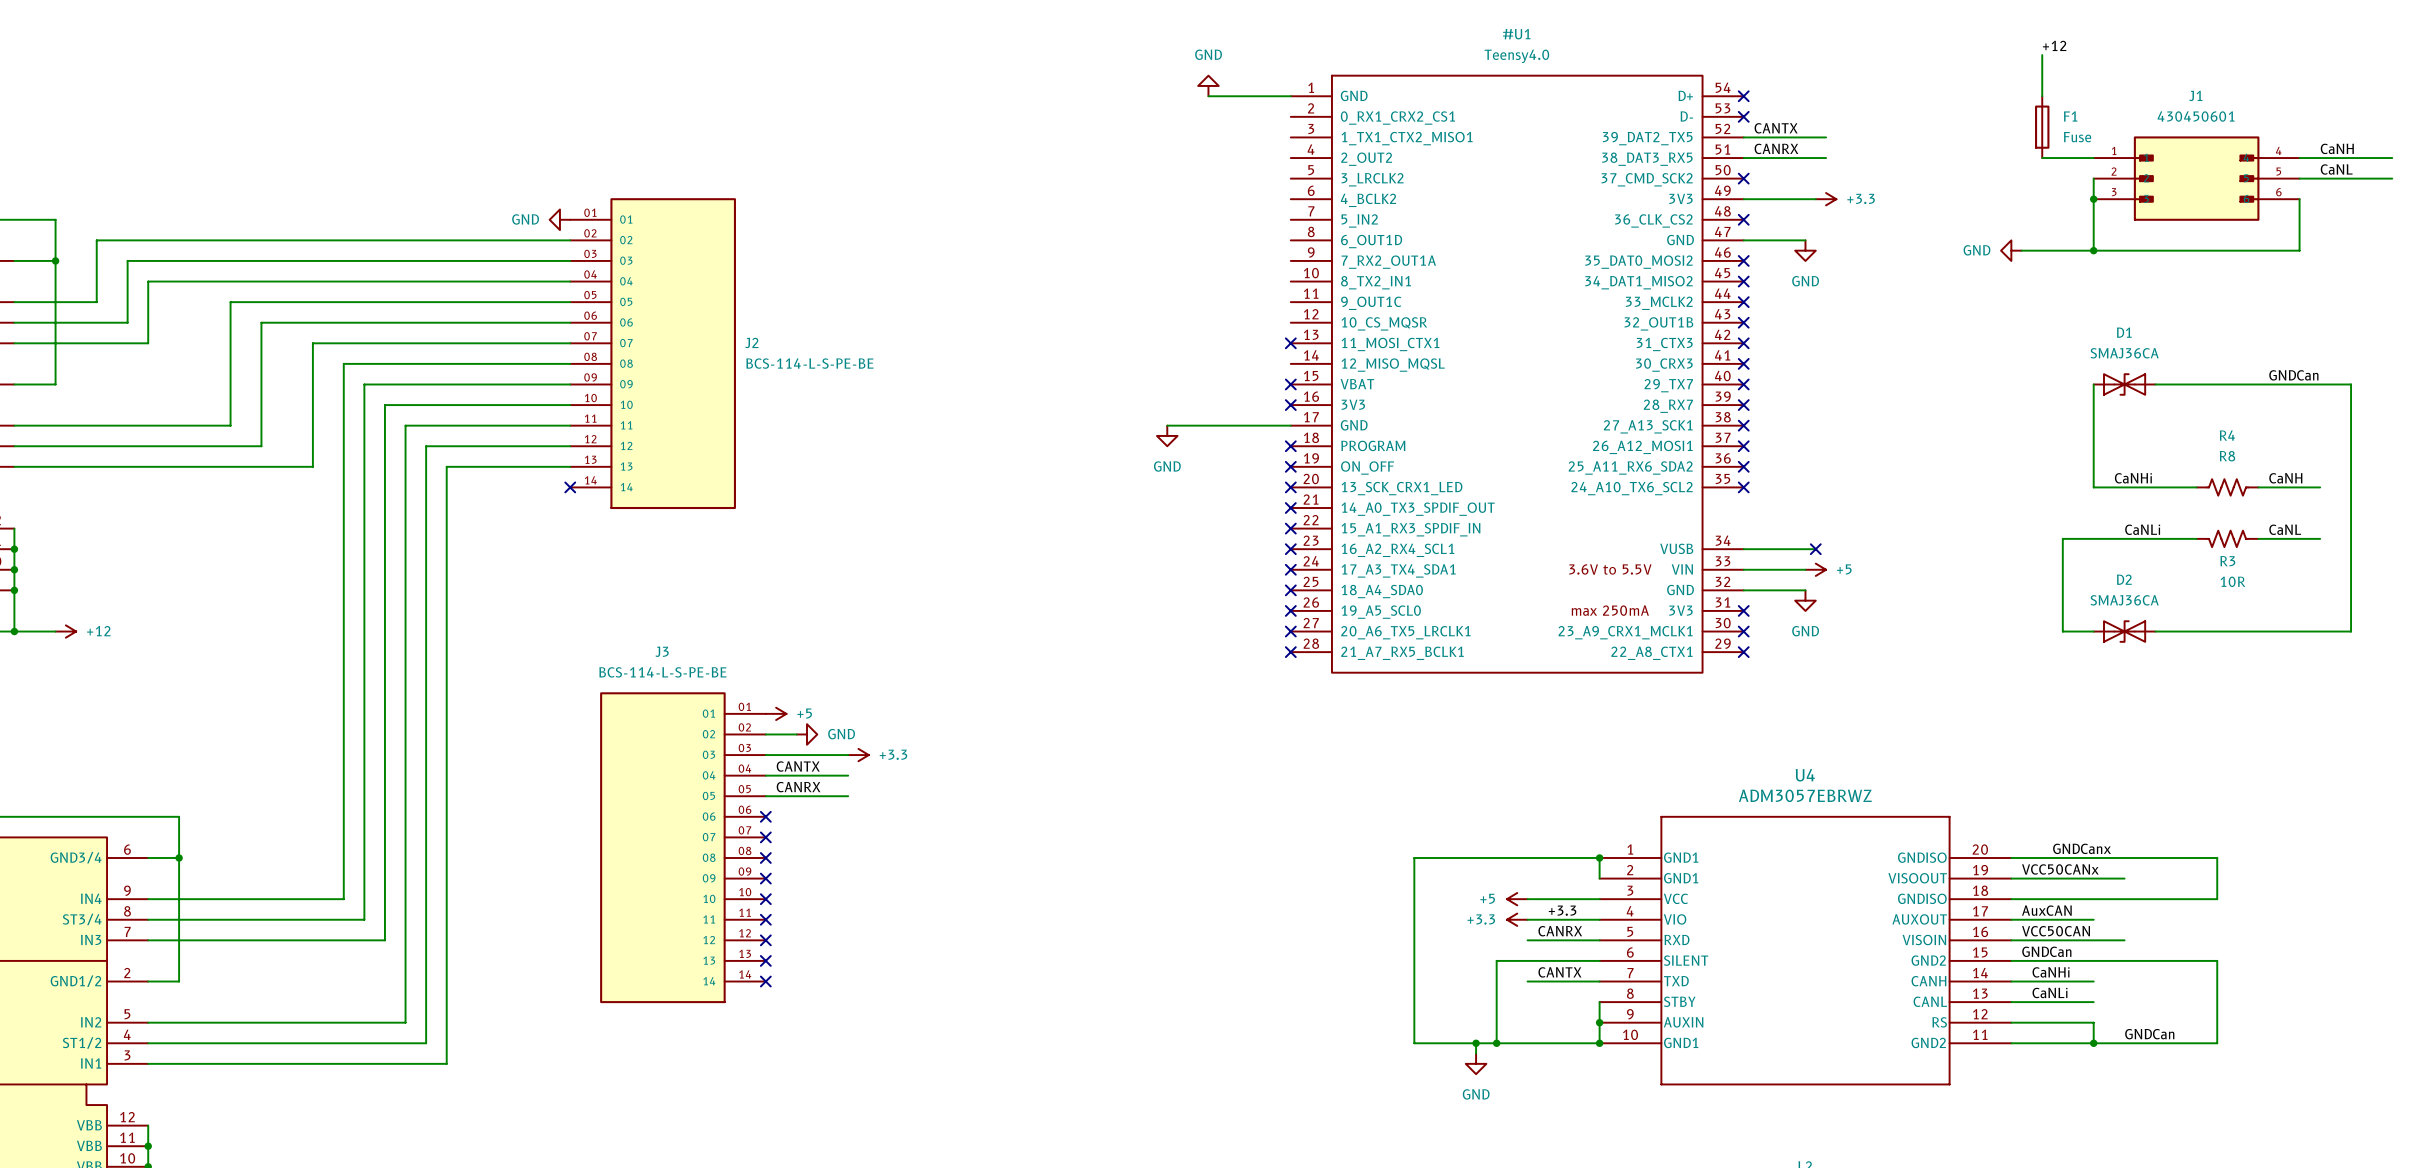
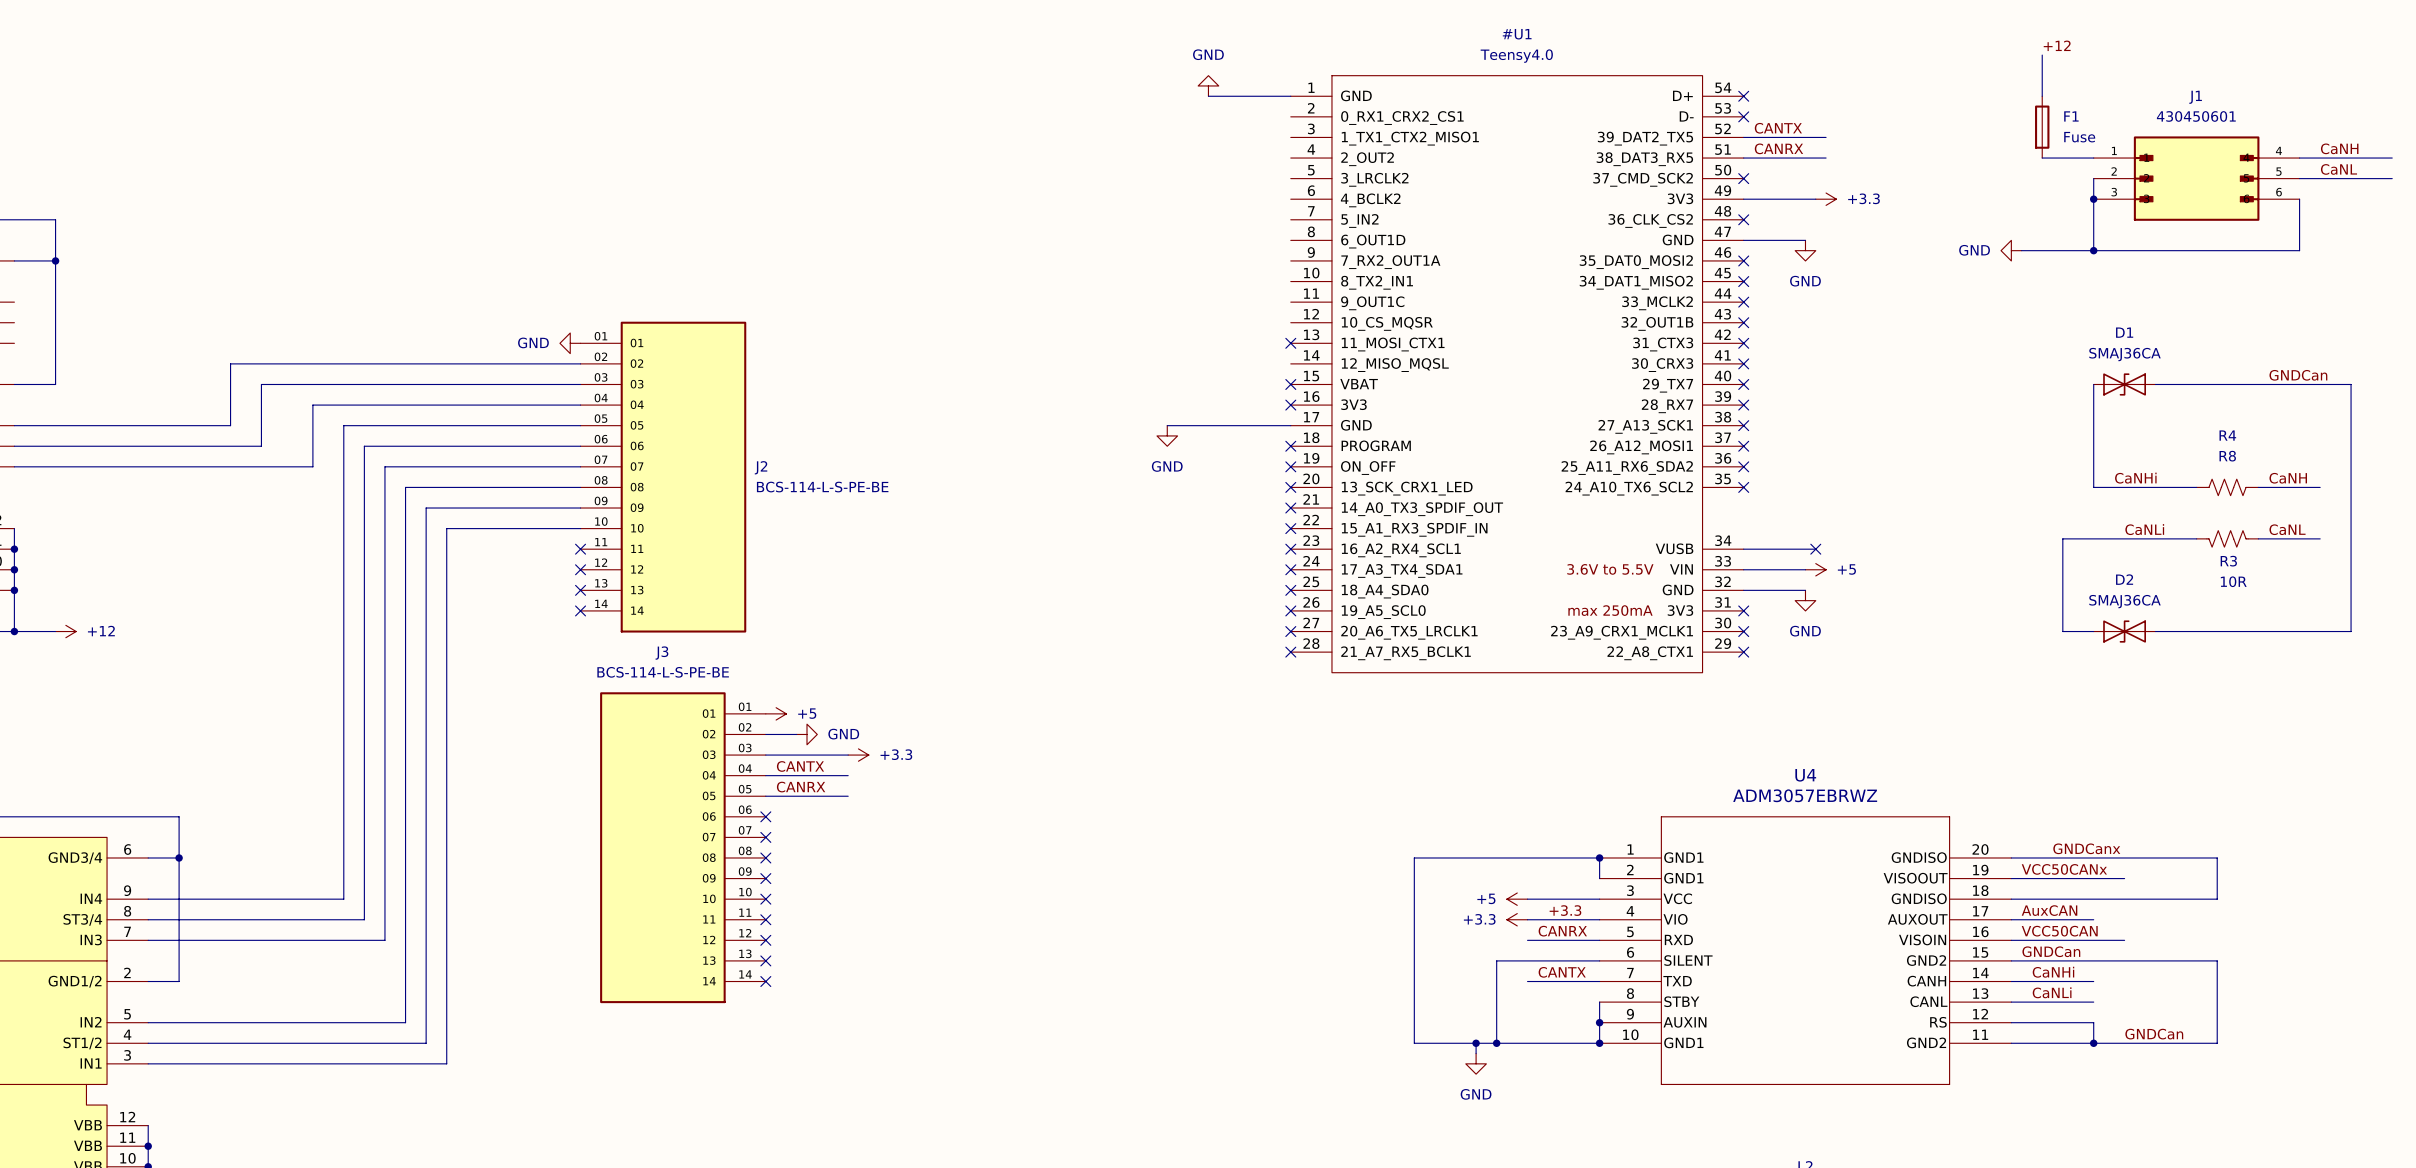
power symbol position: GND (559, 219) -> GND (570, 343)
wire: (570, 240) (96, 240) (96, 302) (14, 302) -> none
wire: (570, 260) (127, 260) (127, 322) (14, 322) -> none
wire: (570, 281) (148, 281) (148, 343) (14, 343) -> none
wire: (570, 302) (230, 302) (230, 363) -> none
wire: (570, 322) (261, 322) (261, 384) -> (364, 384) (261, 384)
wire: (570, 343) (312, 343) (312, 405) -> none
J2 position: (653, 353) -> (663, 477)
wire: (343, 363) (343, 425) -> (343, 363) (230, 363)
wire: (364, 384) (364, 446) -> (426, 446) (364, 446)
wire: (384, 405) (384, 466) -> (384, 405) (312, 405)
wire: (405, 425) (405, 487) -> (405, 425) (343, 425)
wire: (426, 446) (426, 508) -> (580, 508) (426, 508)
wire: (446, 466) (446, 528) -> (446, 466) (384, 466)
wire: none -> (405, 487) (580, 487)
no-connect mark: (570, 487) -> none
wire: none -> (446, 528) (580, 528)
no-connect mark: none -> (580, 549)
no-connect mark: none -> (580, 569)
no-connect mark: none -> (580, 590)
no-connect mark: none -> (580, 610)

